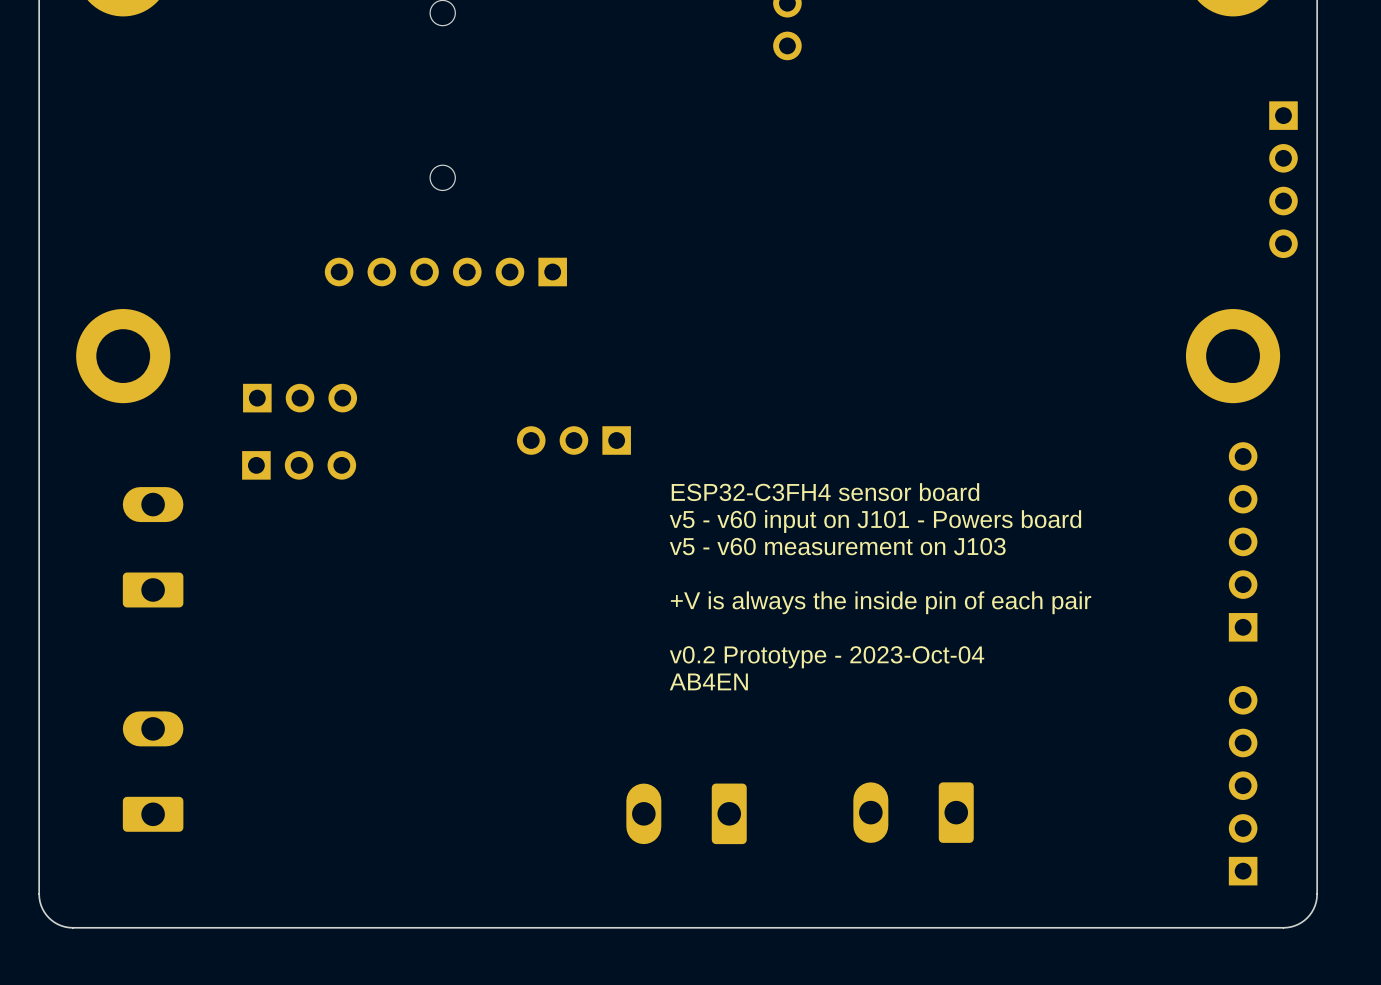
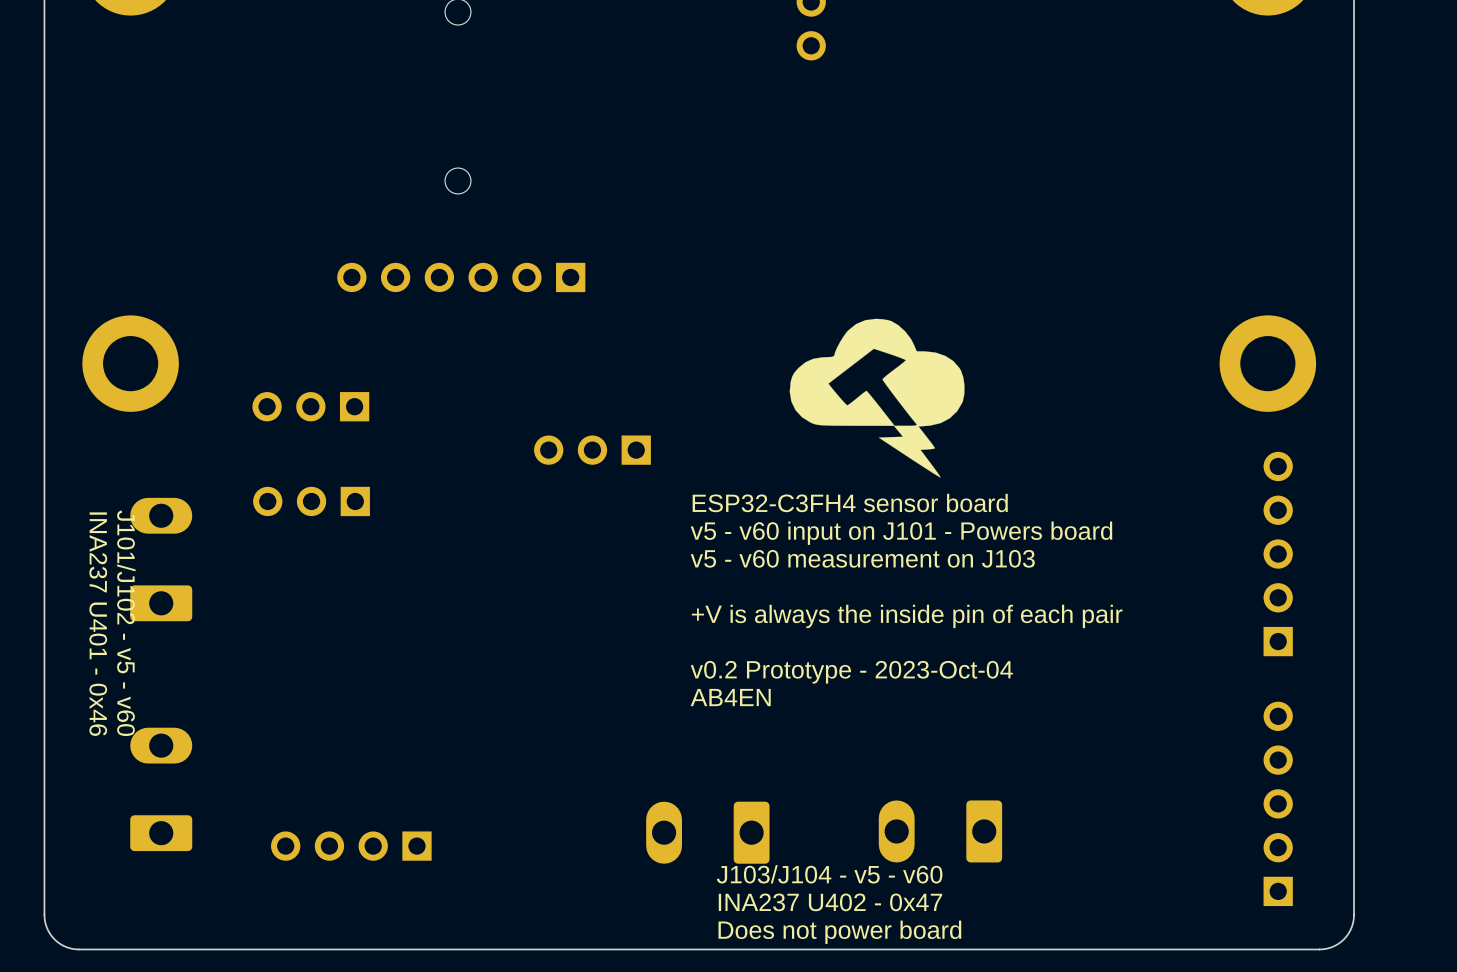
part: (1283, 179) -> none
drawing: none -> [789, 318, 965, 478]
part rotation: 0° (300, 398) -> 180° (310, 406)
part rotation: 0° (299, 465) -> 180° (311, 501)
text: none -> J101/J102 - v5 - v60 (126, 623)
text: none -> INA237 U401 - 0x46 (98, 624)
part: none -> (351, 846)
text: none -> J103/J104 - v5 - v60 (829, 874)
text: none -> INA237 U402 - 0x47 (830, 902)
text: none -> Does not power board (839, 932)

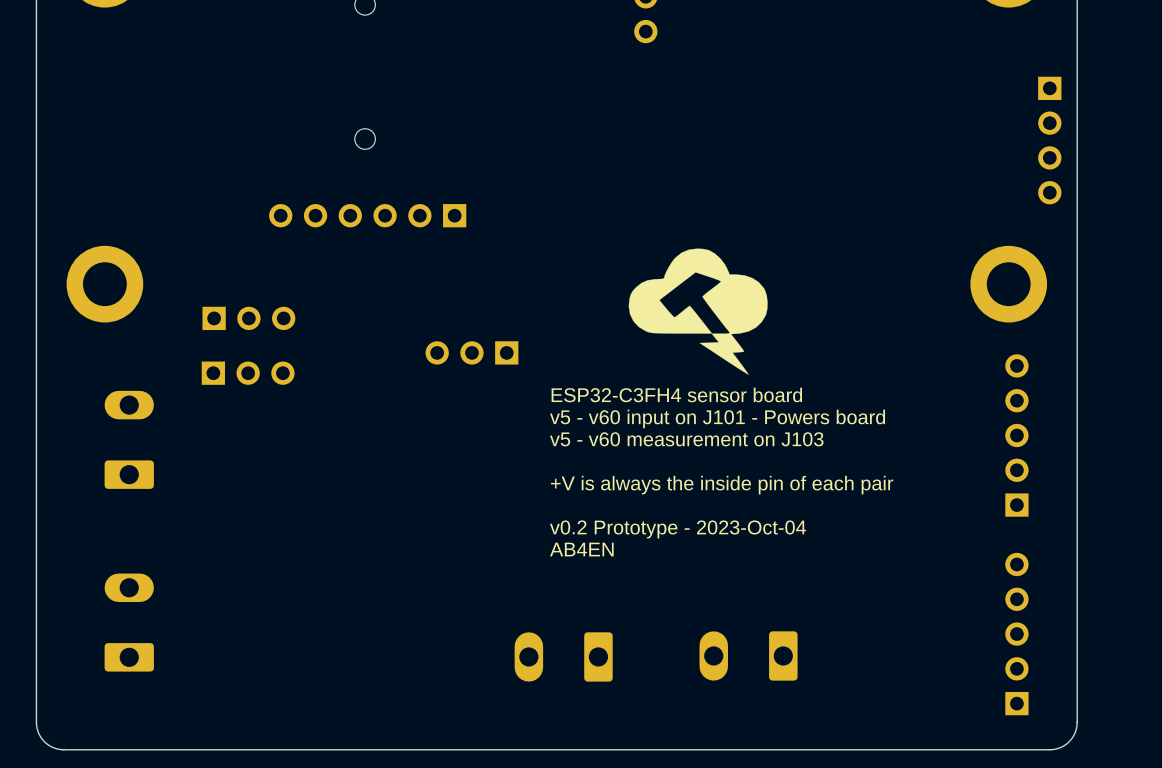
part: none -> (1049, 140)
part rotation: 0° (310, 406) -> 180° (248, 318)
part rotation: 0° (311, 501) -> 180° (248, 373)
text: J101/J102 - v5 - v60 (126, 623) -> none
text: INA237 U401 - 0x46 (98, 624) -> none
part: (351, 846) -> none
text: J103/J104 - v5 - v60 (829, 874) -> none
text: INA237 U402 - 0x47 (830, 902) -> none
text: Does not power board (839, 932) -> none

